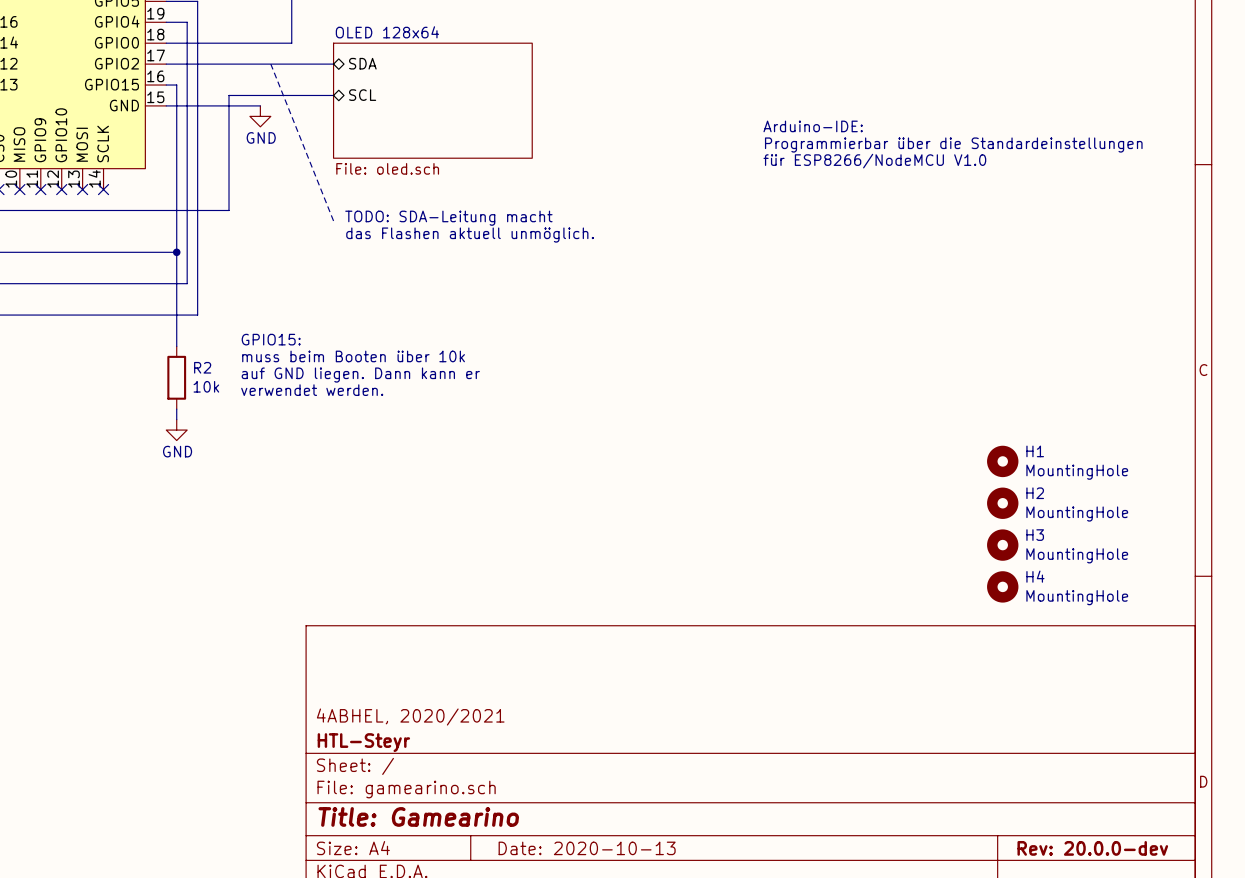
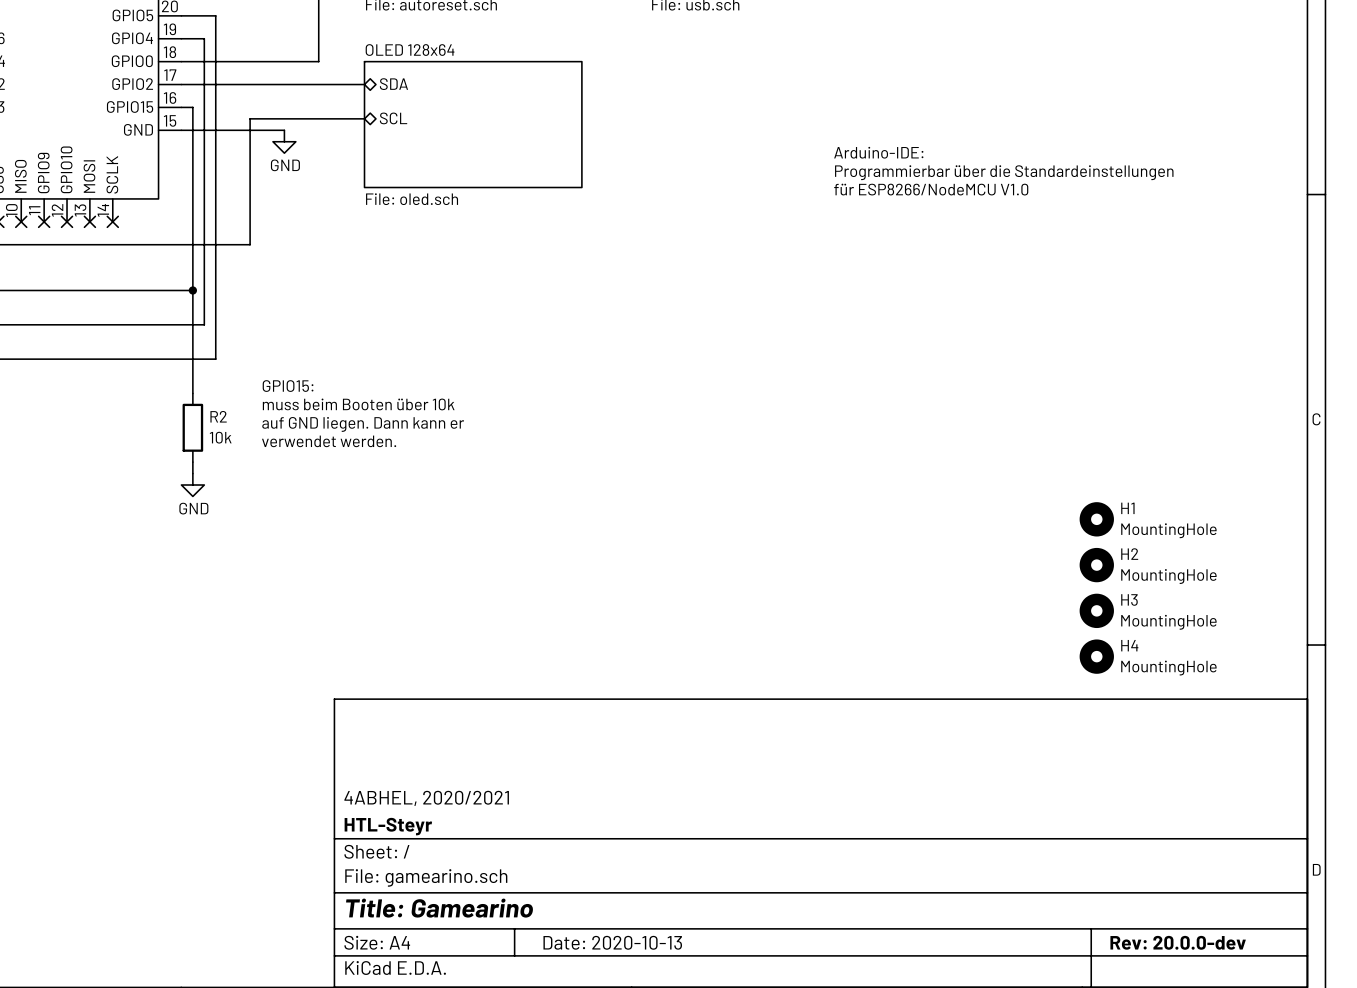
line: (270, 64) (333, 220) -> none
text: TODO: SDA-Leitung macht (448, 218) -> none
text: das Flashen aktuell unmöglich. (470, 235) -> none

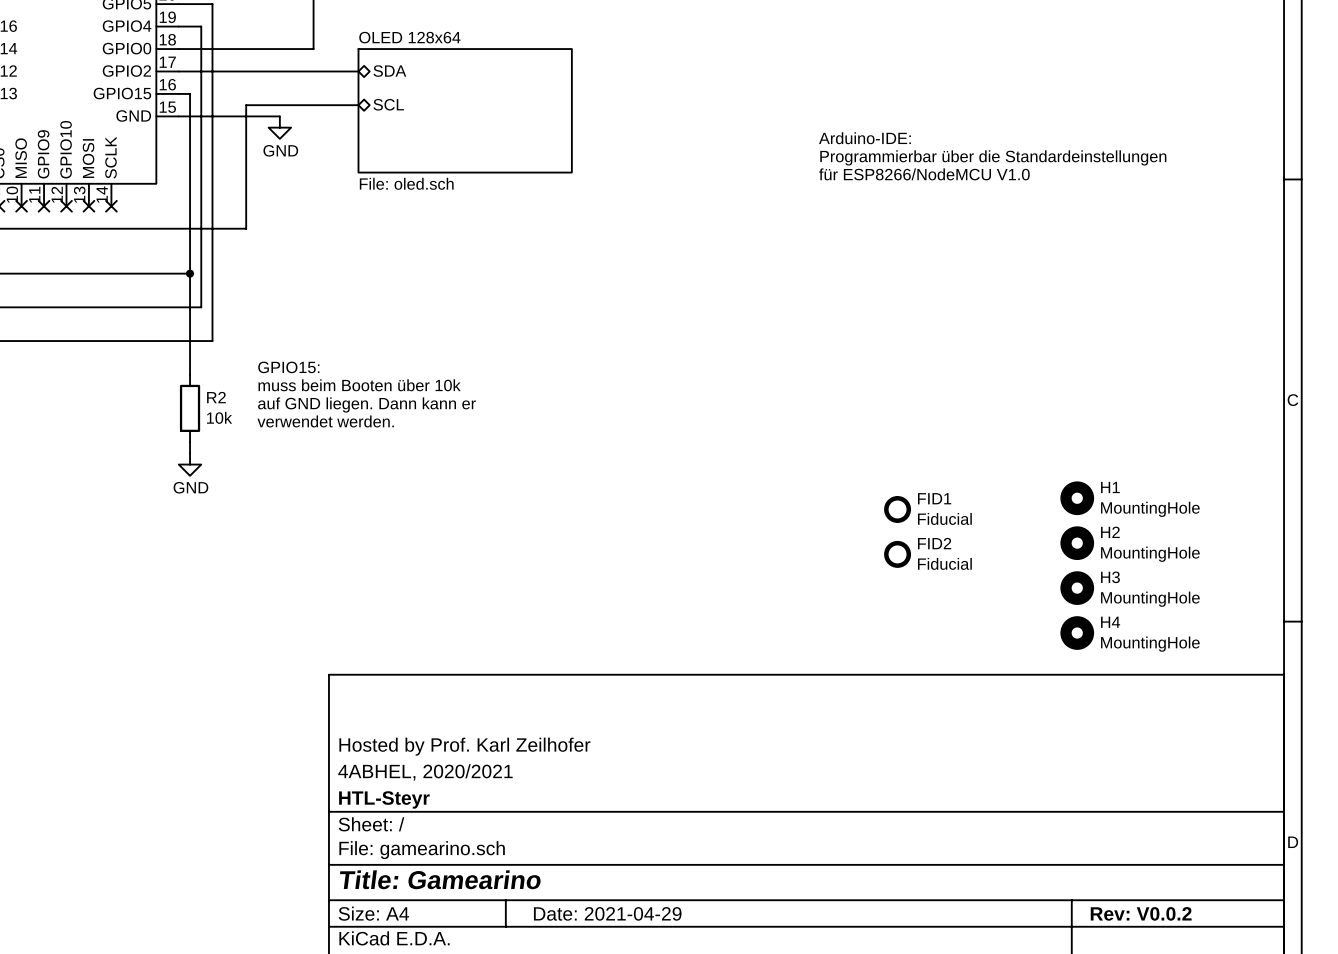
FID1: none -> Fiducial (897, 509)
FID2: none -> Fiducial (897, 554)
title block: none -> Hosted by Prof. Karl Zeilhofer (464, 746)
title block: Date: 2020-10-13 (612, 942) -> Date: 2021-04-29 (607, 913)
title block: Rev: 20.0.0-dev (1178, 942) -> Rev: V0.0.2 (1141, 913)

